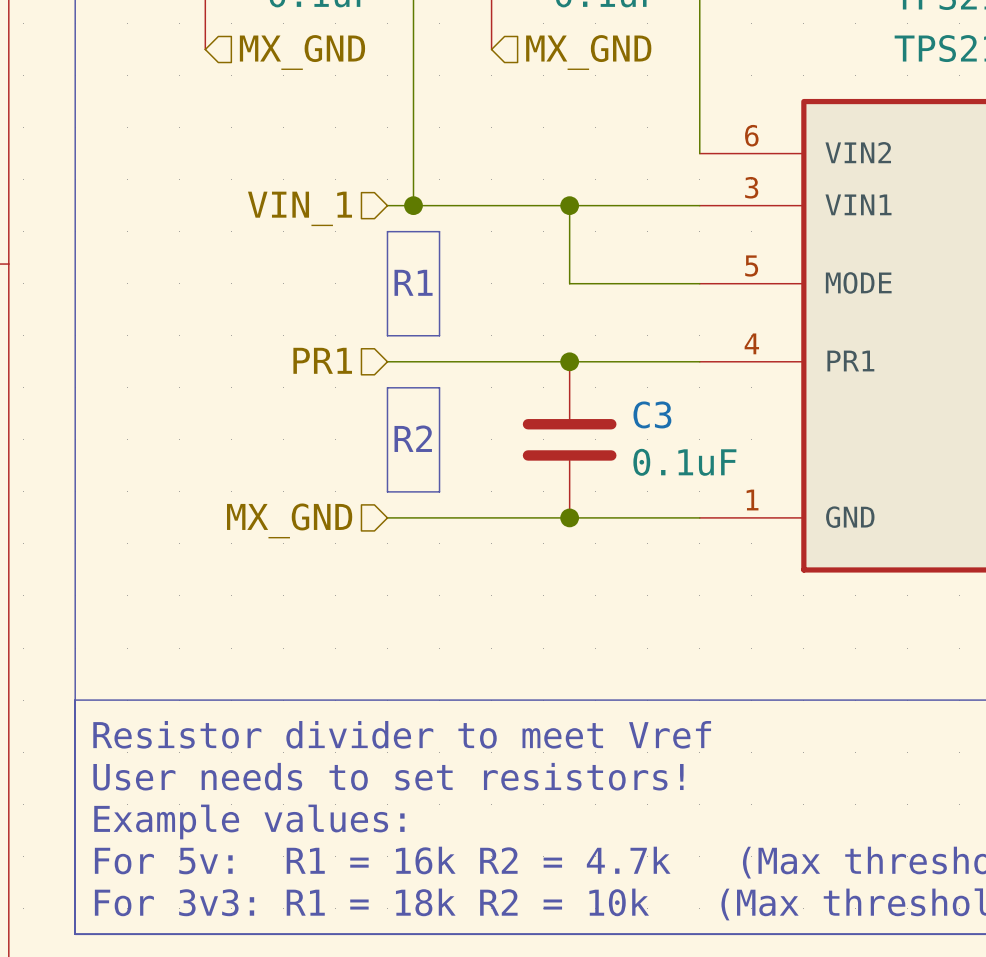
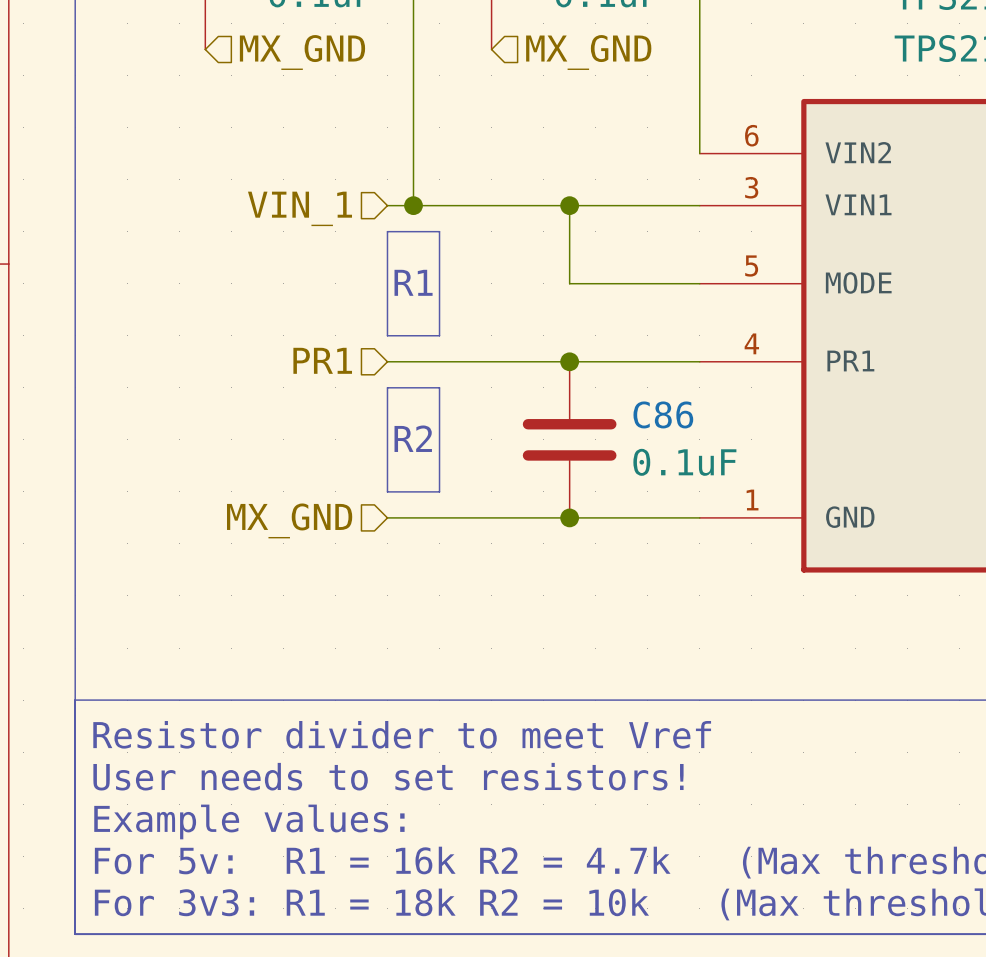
C3 name: C3 (652, 414) -> C86 (663, 414)

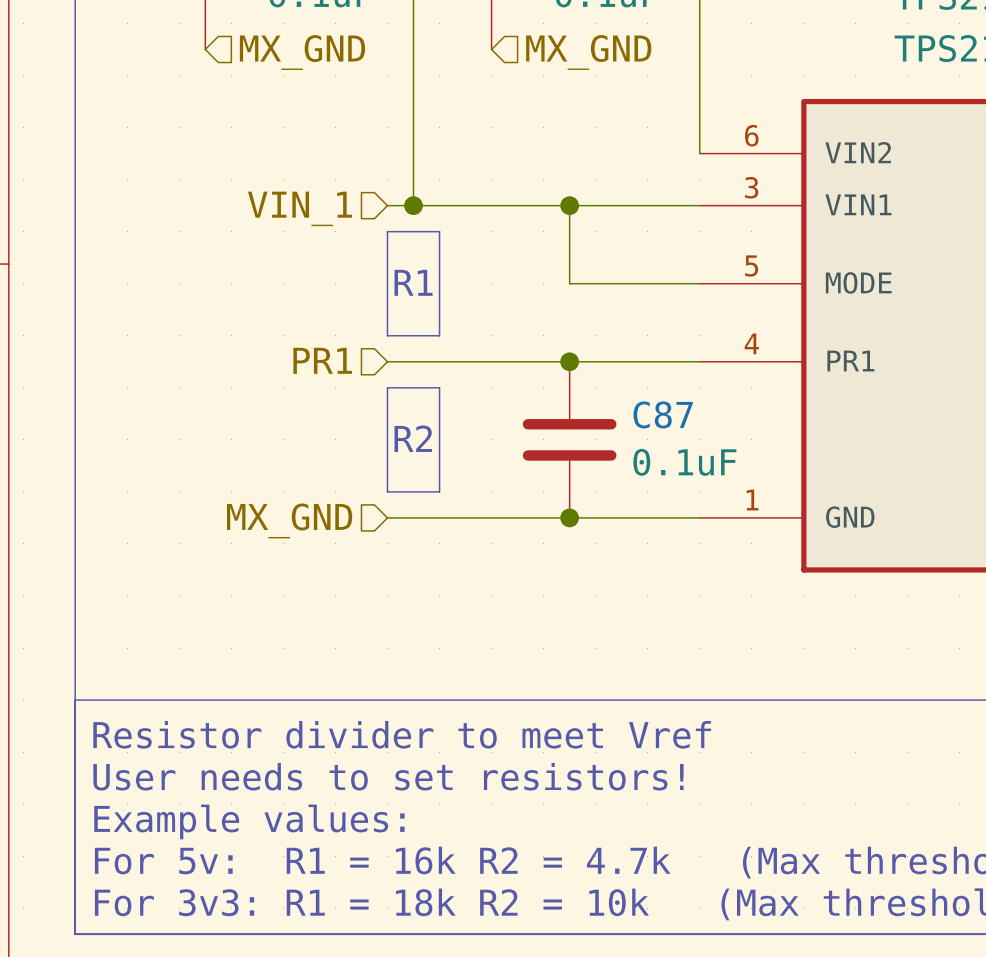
C86 name: C86 (663, 414) -> C87 (663, 414)

